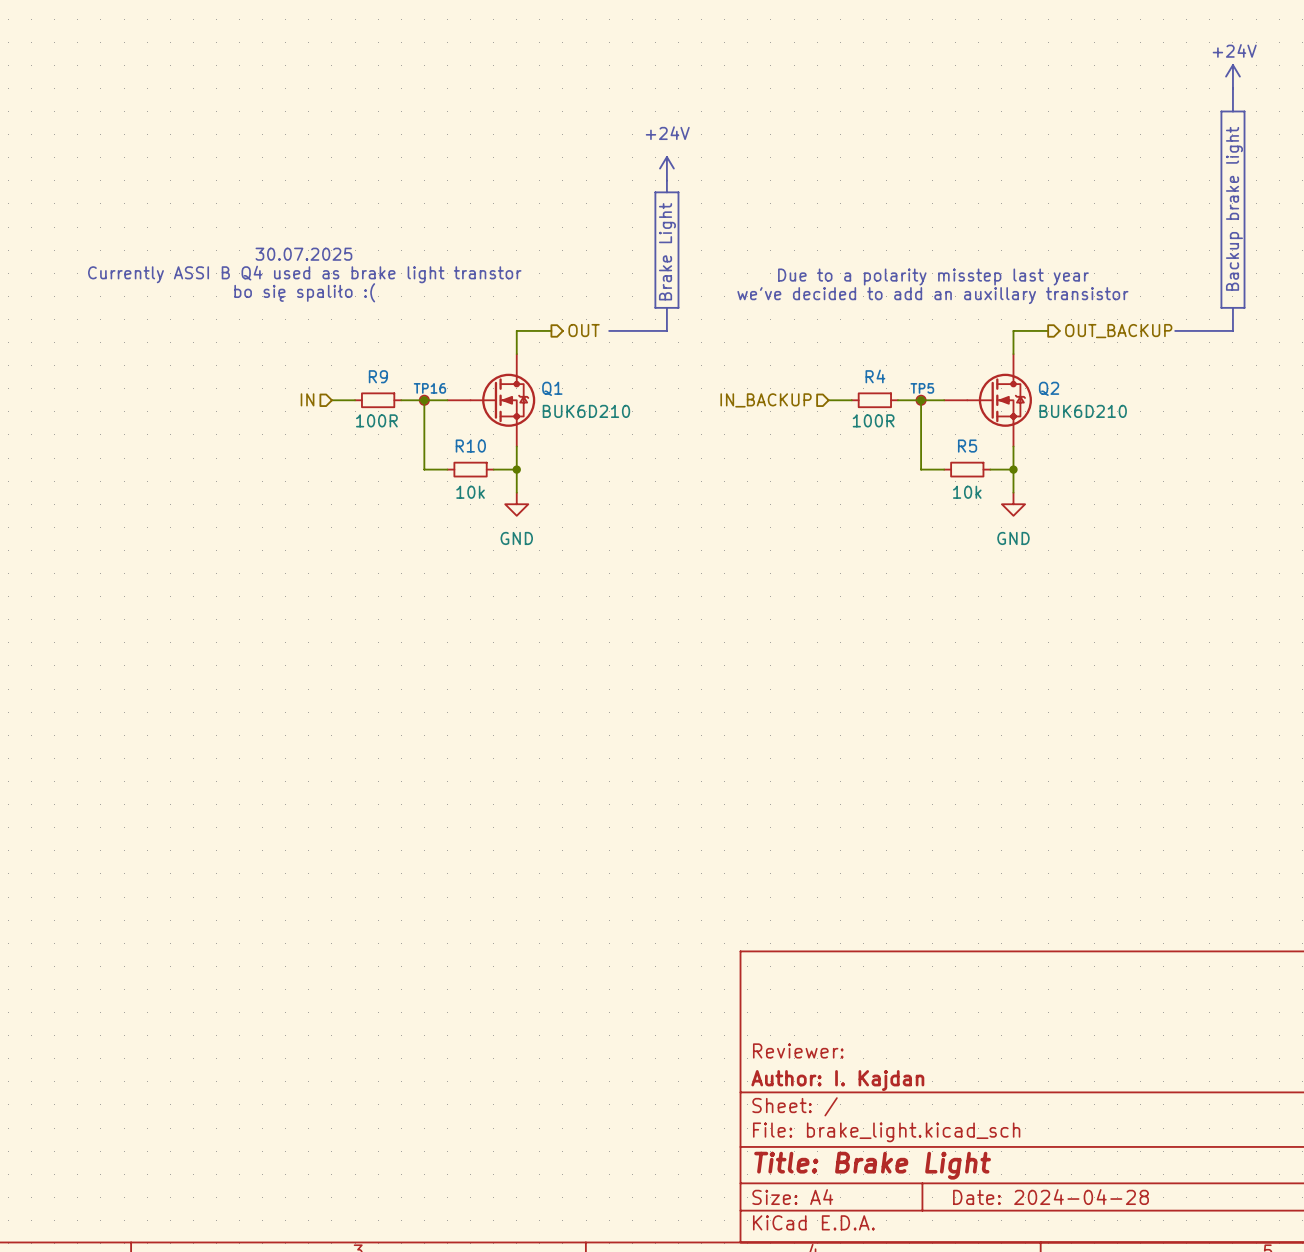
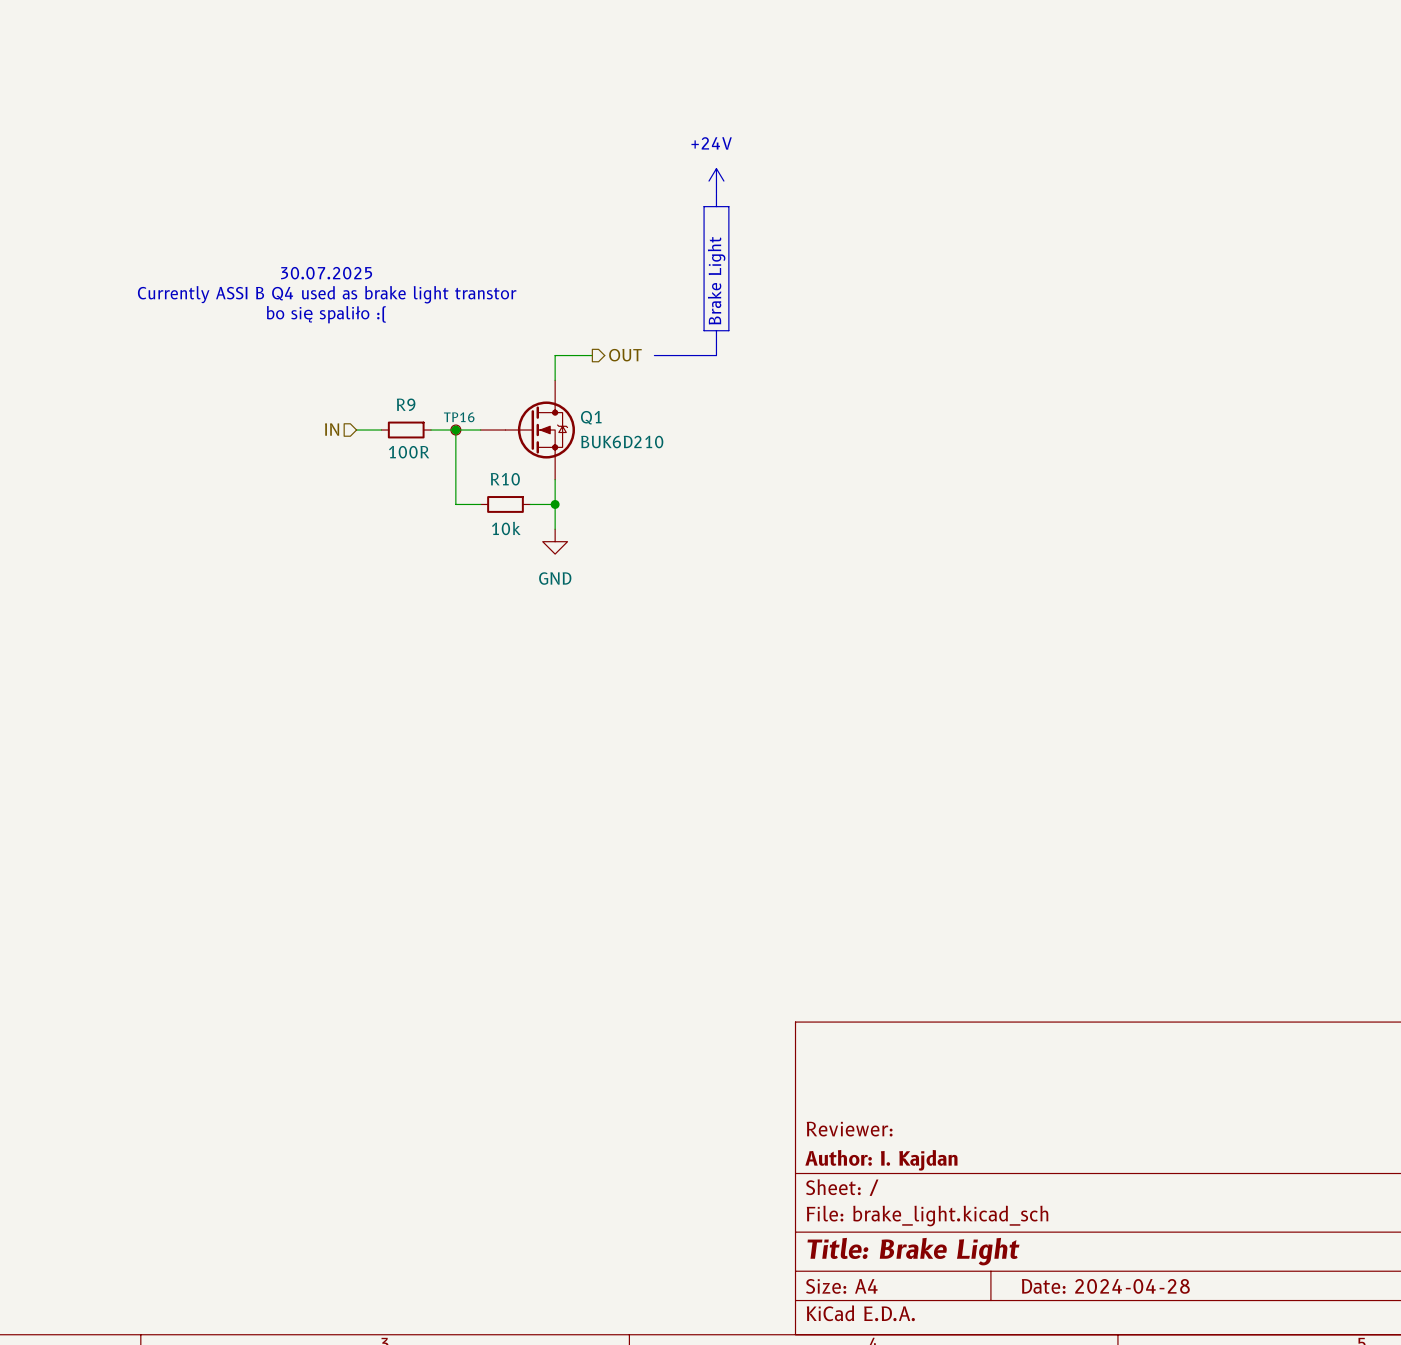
text: +24V (1234, 50) -> none
line: (1232, 65) (1232, 111) -> none
line: (1232, 65) (1226, 76) -> none
line: (1232, 65) (1239, 76) -> none
line: (1221, 111) (1244, 111) (1244, 307) (1221, 307) (1221, 111) -> none
text: Backup brake light (1234, 208) -> none
text: Due to a polarity misstep last year (933, 276) -> none
text: we've decided to add an auxillary transistor (932, 295) -> none
line: (1232, 307) (1232, 330) (1175, 330) -> none
wire: (1048, 330) (1013, 330) (1013, 354) -> none
hierarchical label: OUT_BACKUP (1118, 331) -> none
hierarchical label: IN_BACKUP (766, 400) -> none
wire: (828, 400) (851, 400) -> none
R4: 100R (874, 400) -> none
wire: (897, 400) (944, 400) -> none
wire: (921, 400) (921, 469) (944, 469) -> none
junction: (921, 400) -> none
TP5: (921, 400) -> none
Q2: BUK6D210 (988, 400) -> none
wire: (1013, 446) (1013, 492) -> none
R5: 10k (967, 469) -> none
wire: (990, 469) (1013, 469) -> none
junction: (1013, 469) -> none
power symbol: GND (1013, 504) -> none

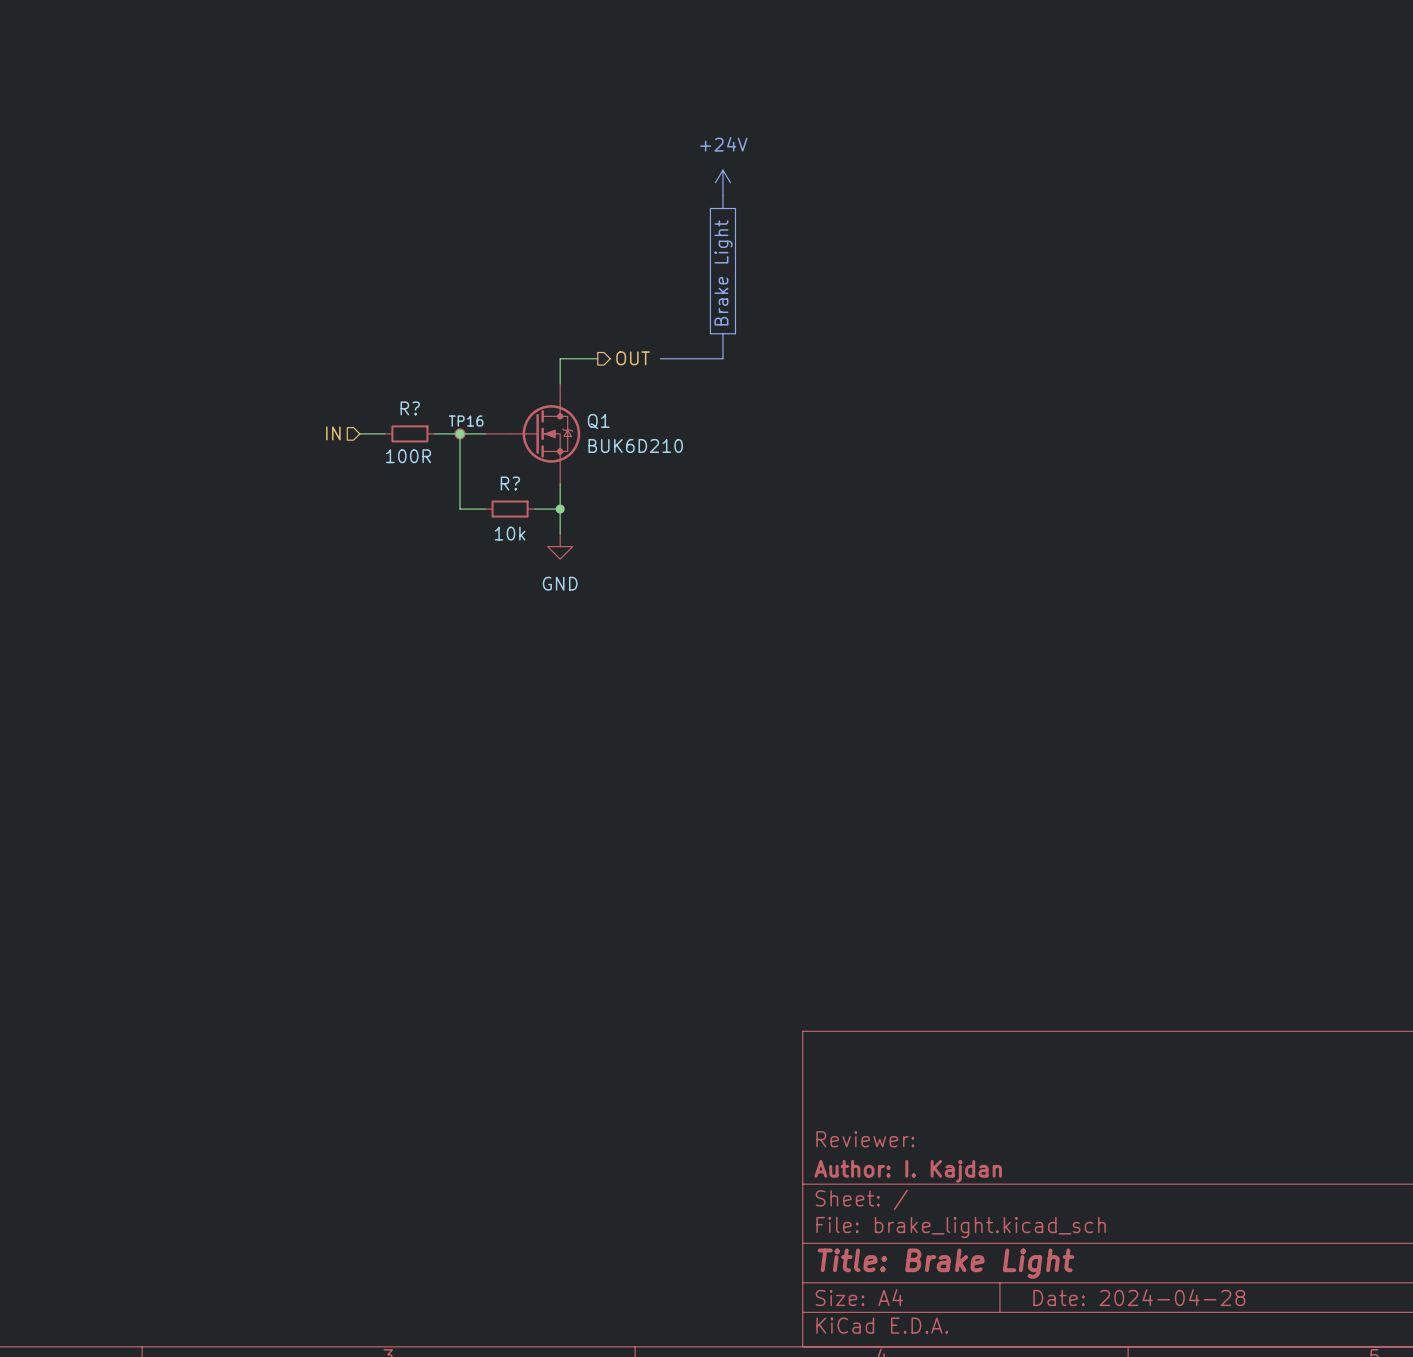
text: 30.07.2025 (326, 273) -> none
text: Currently ASSI B Q4 used as brake light transtor (327, 294) -> none
text: bo się spaliło :( (326, 314) -> none
R9 name: R9 (406, 404) -> R? (410, 408)
R10 name: R10 (505, 479) -> R? (510, 483)

